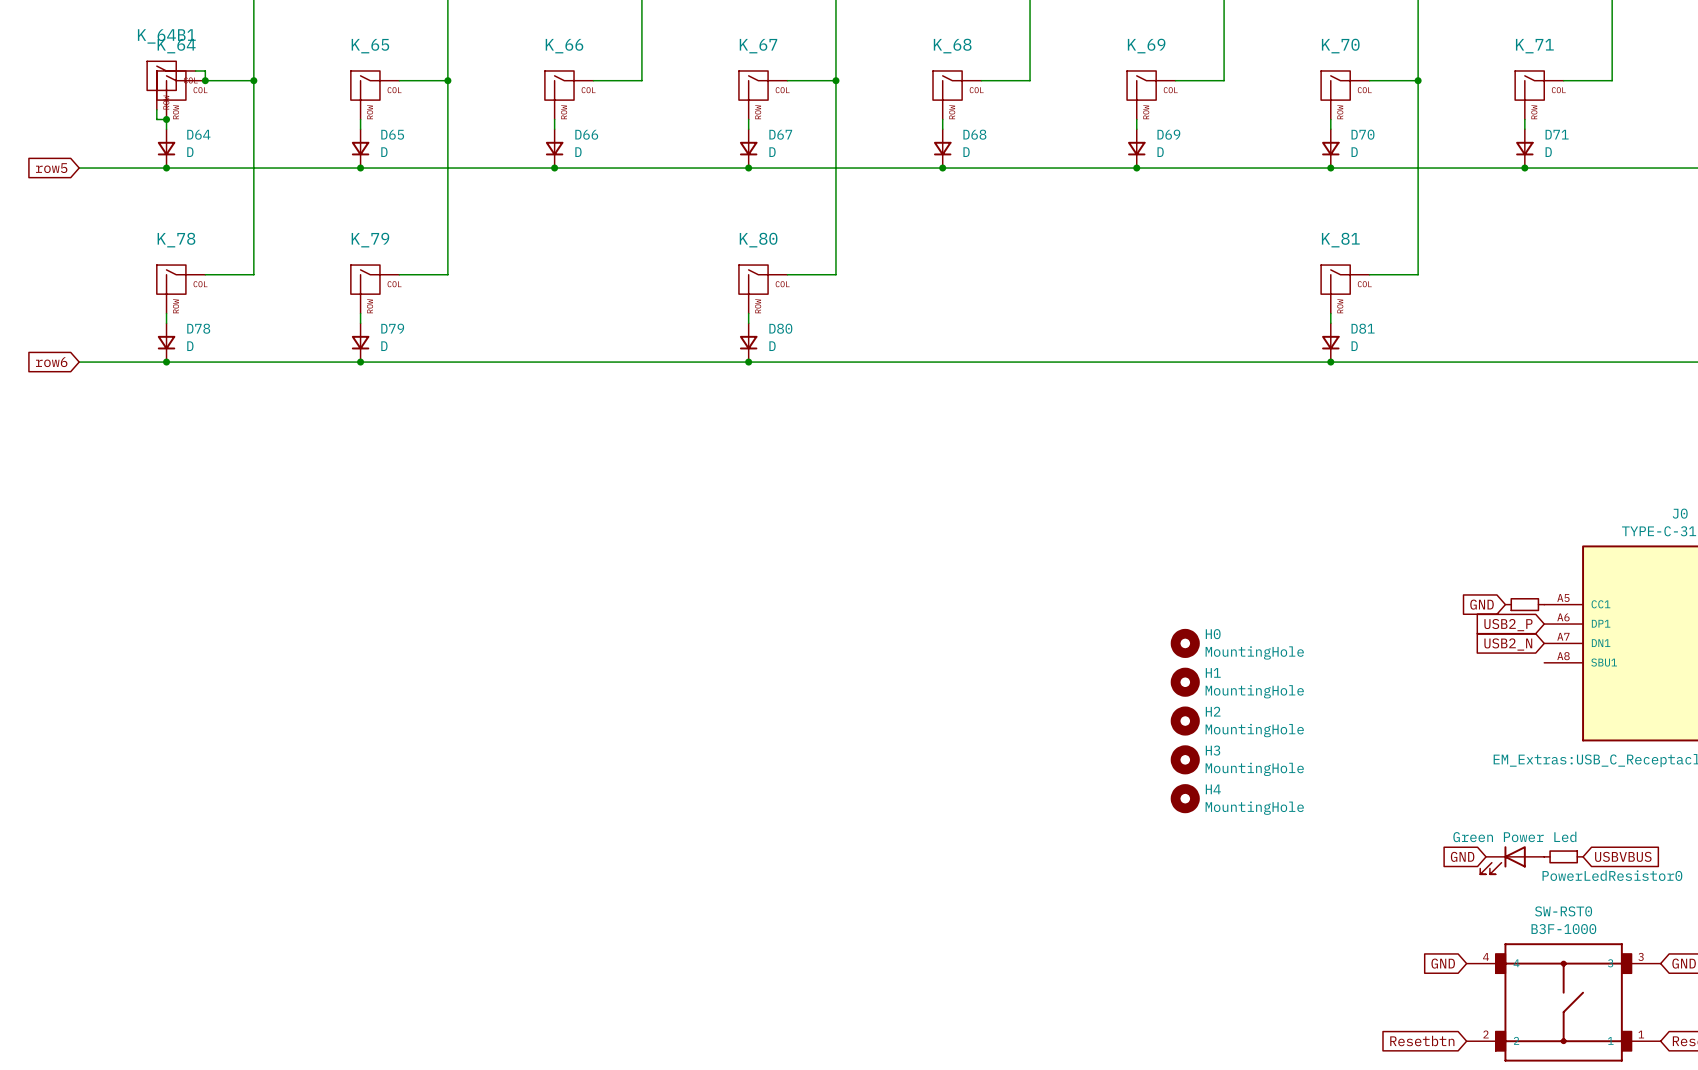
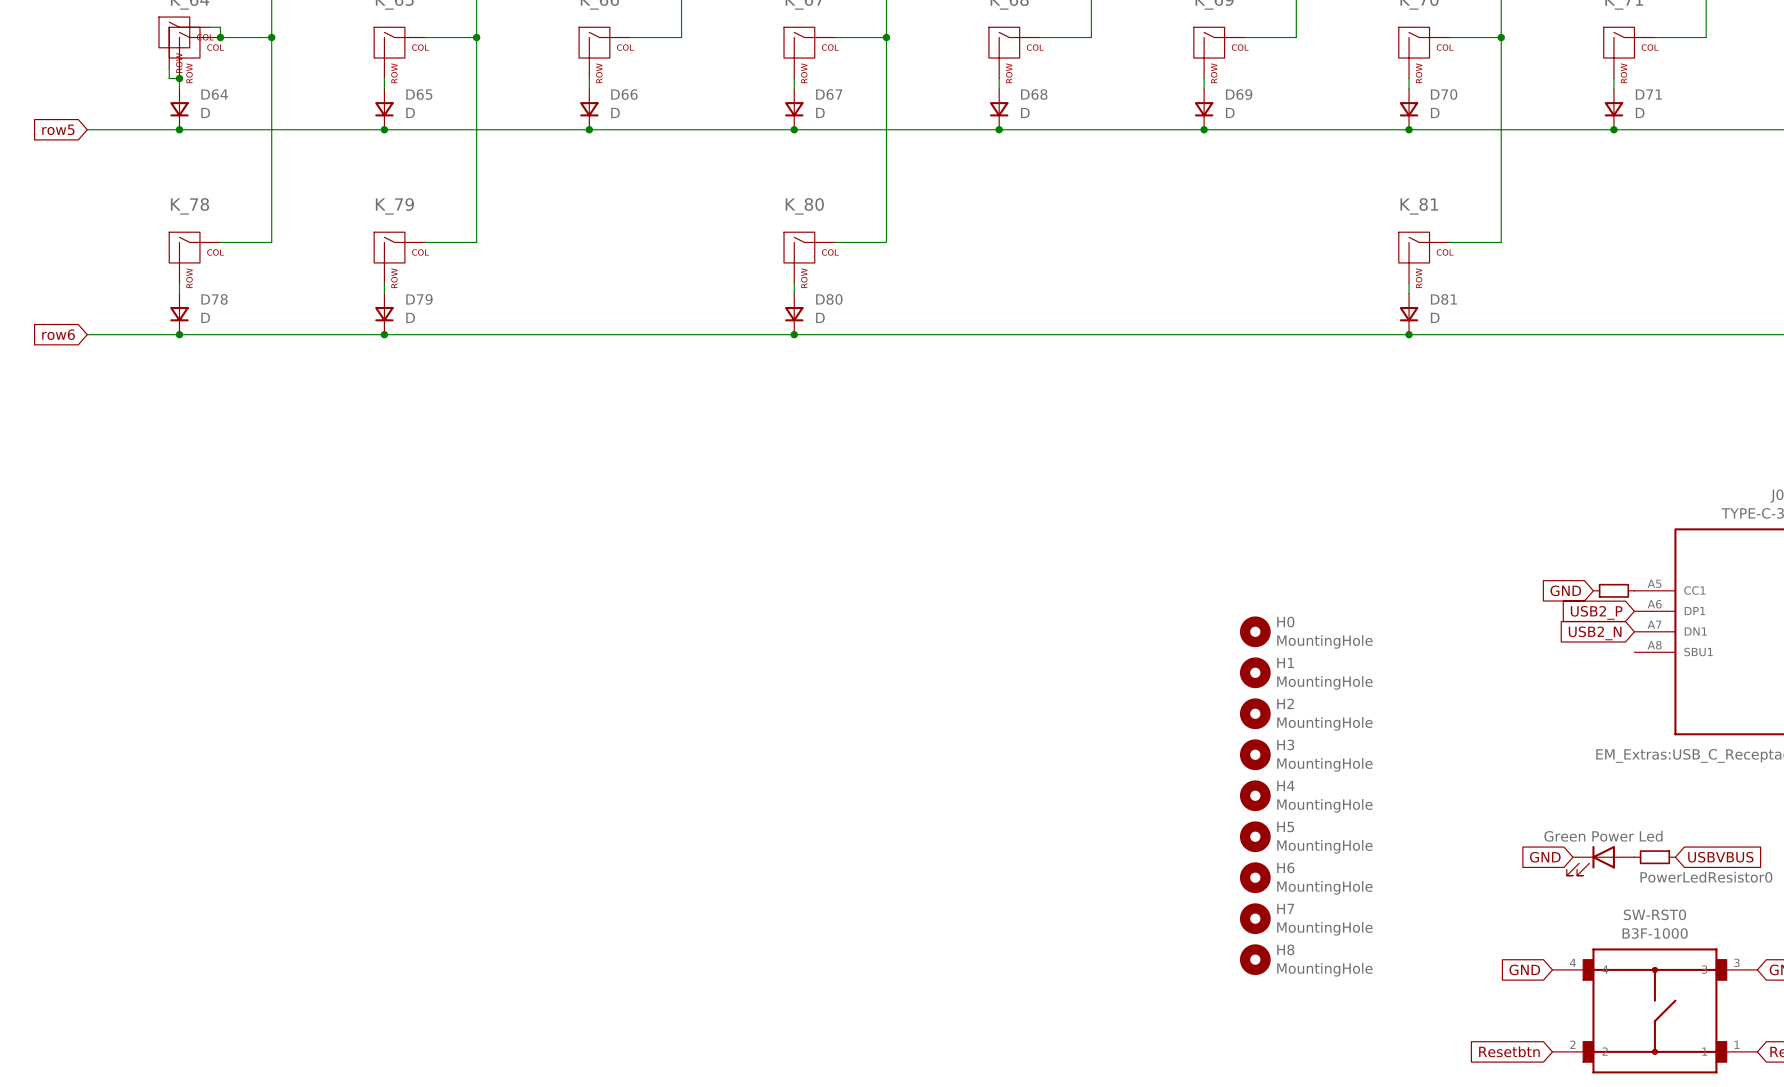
H5: none -> MountingHole (1255, 836)
H6: none -> MountingHole (1255, 877)
H7: none -> MountingHole (1255, 918)
H8: none -> MountingHole (1255, 959)

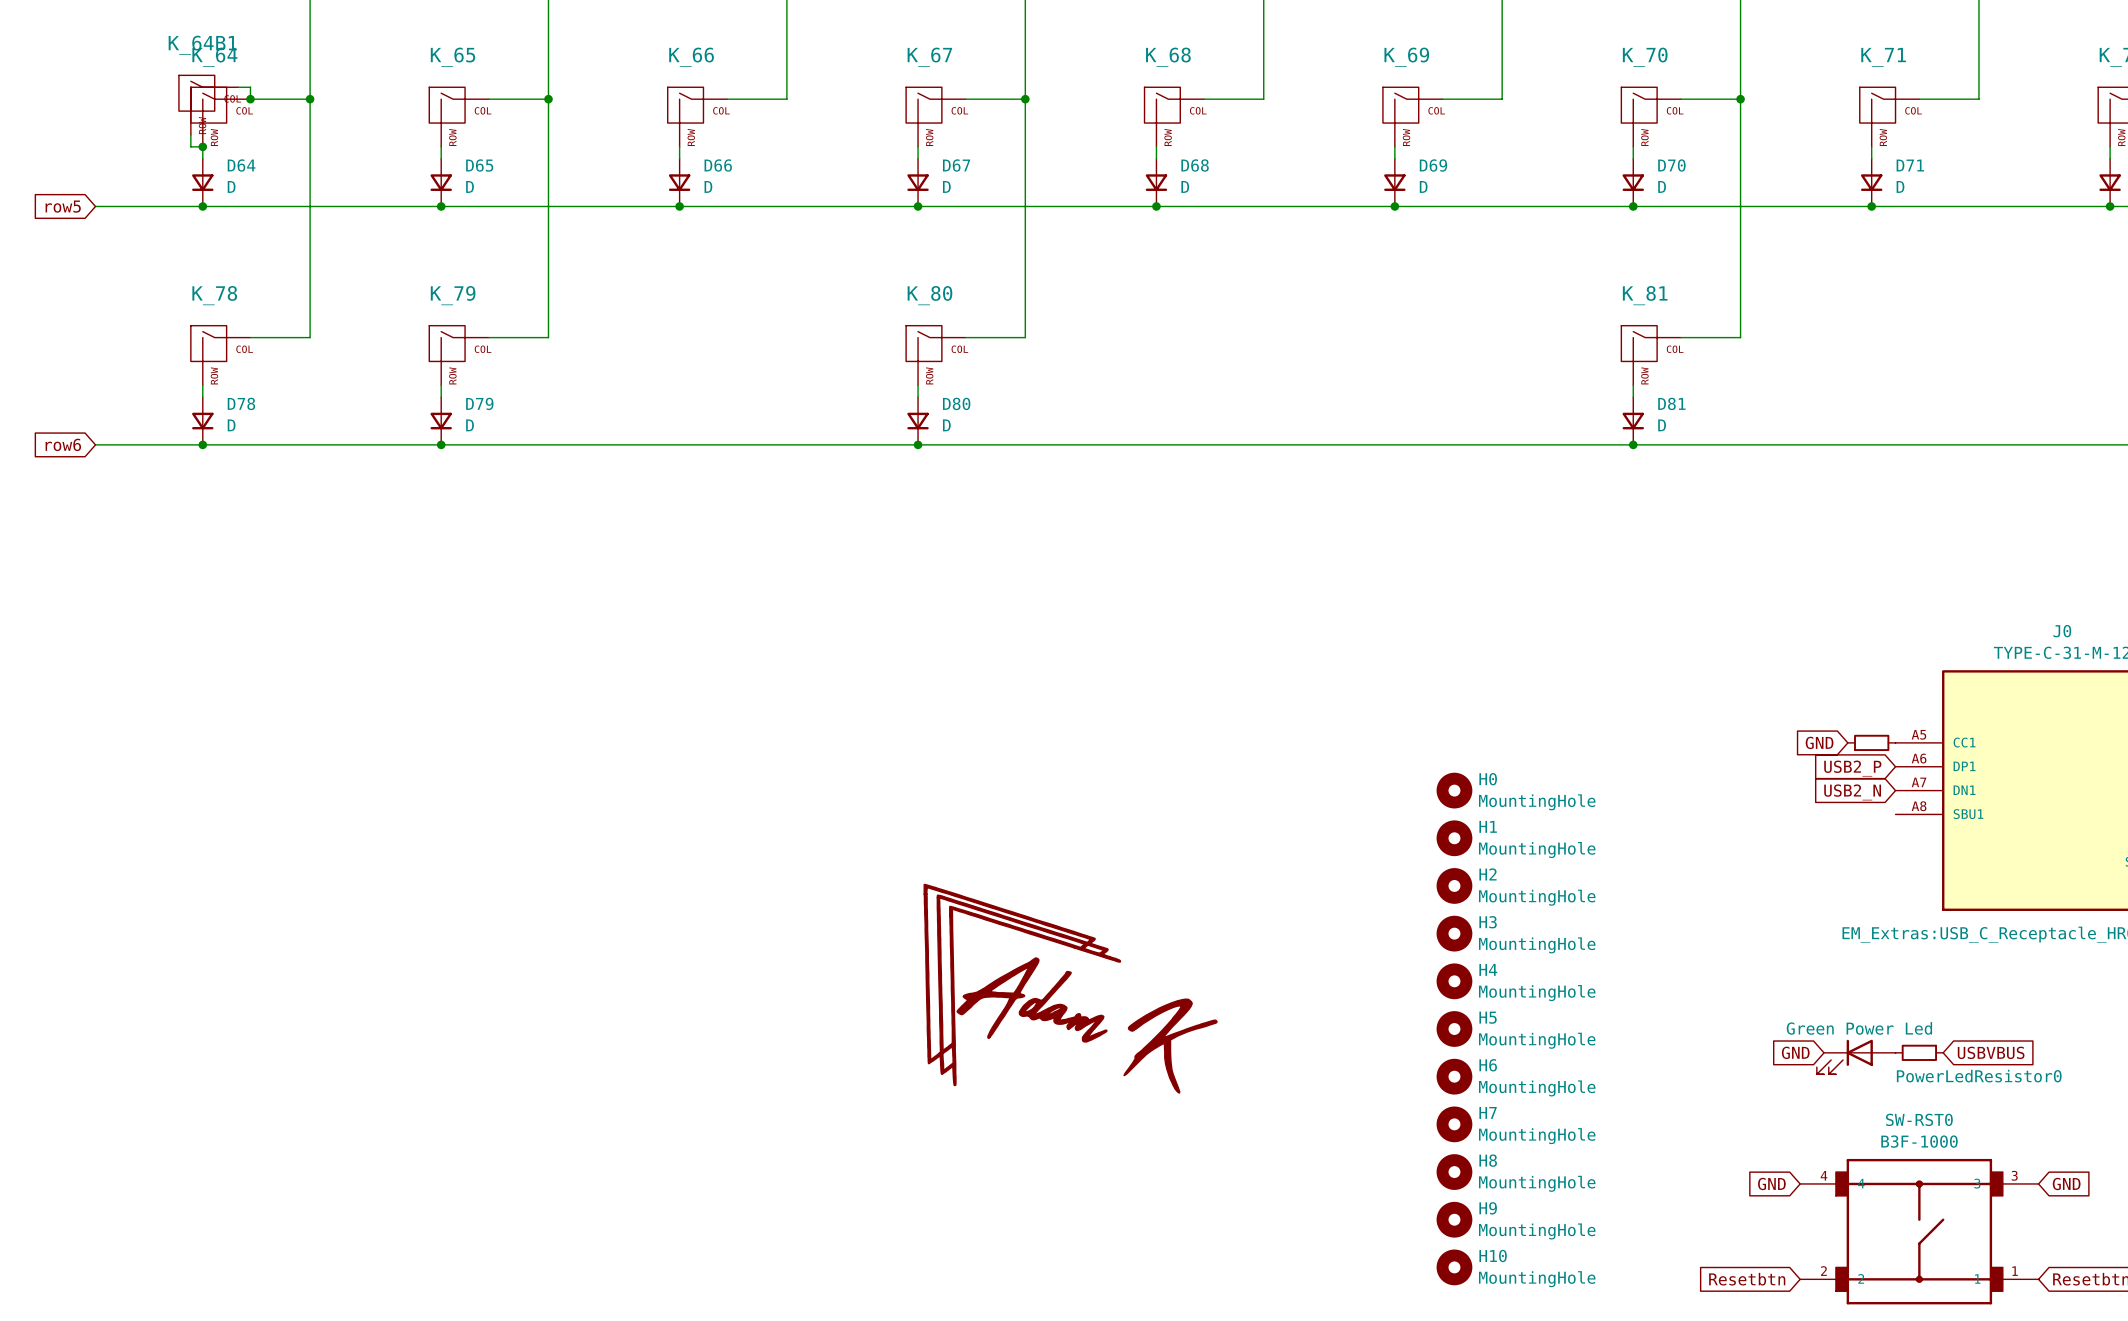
power symbol: none -> (1070, 988)
H9: none -> MountingHole (1454, 1219)
H10: none -> MountingHole (1454, 1267)

